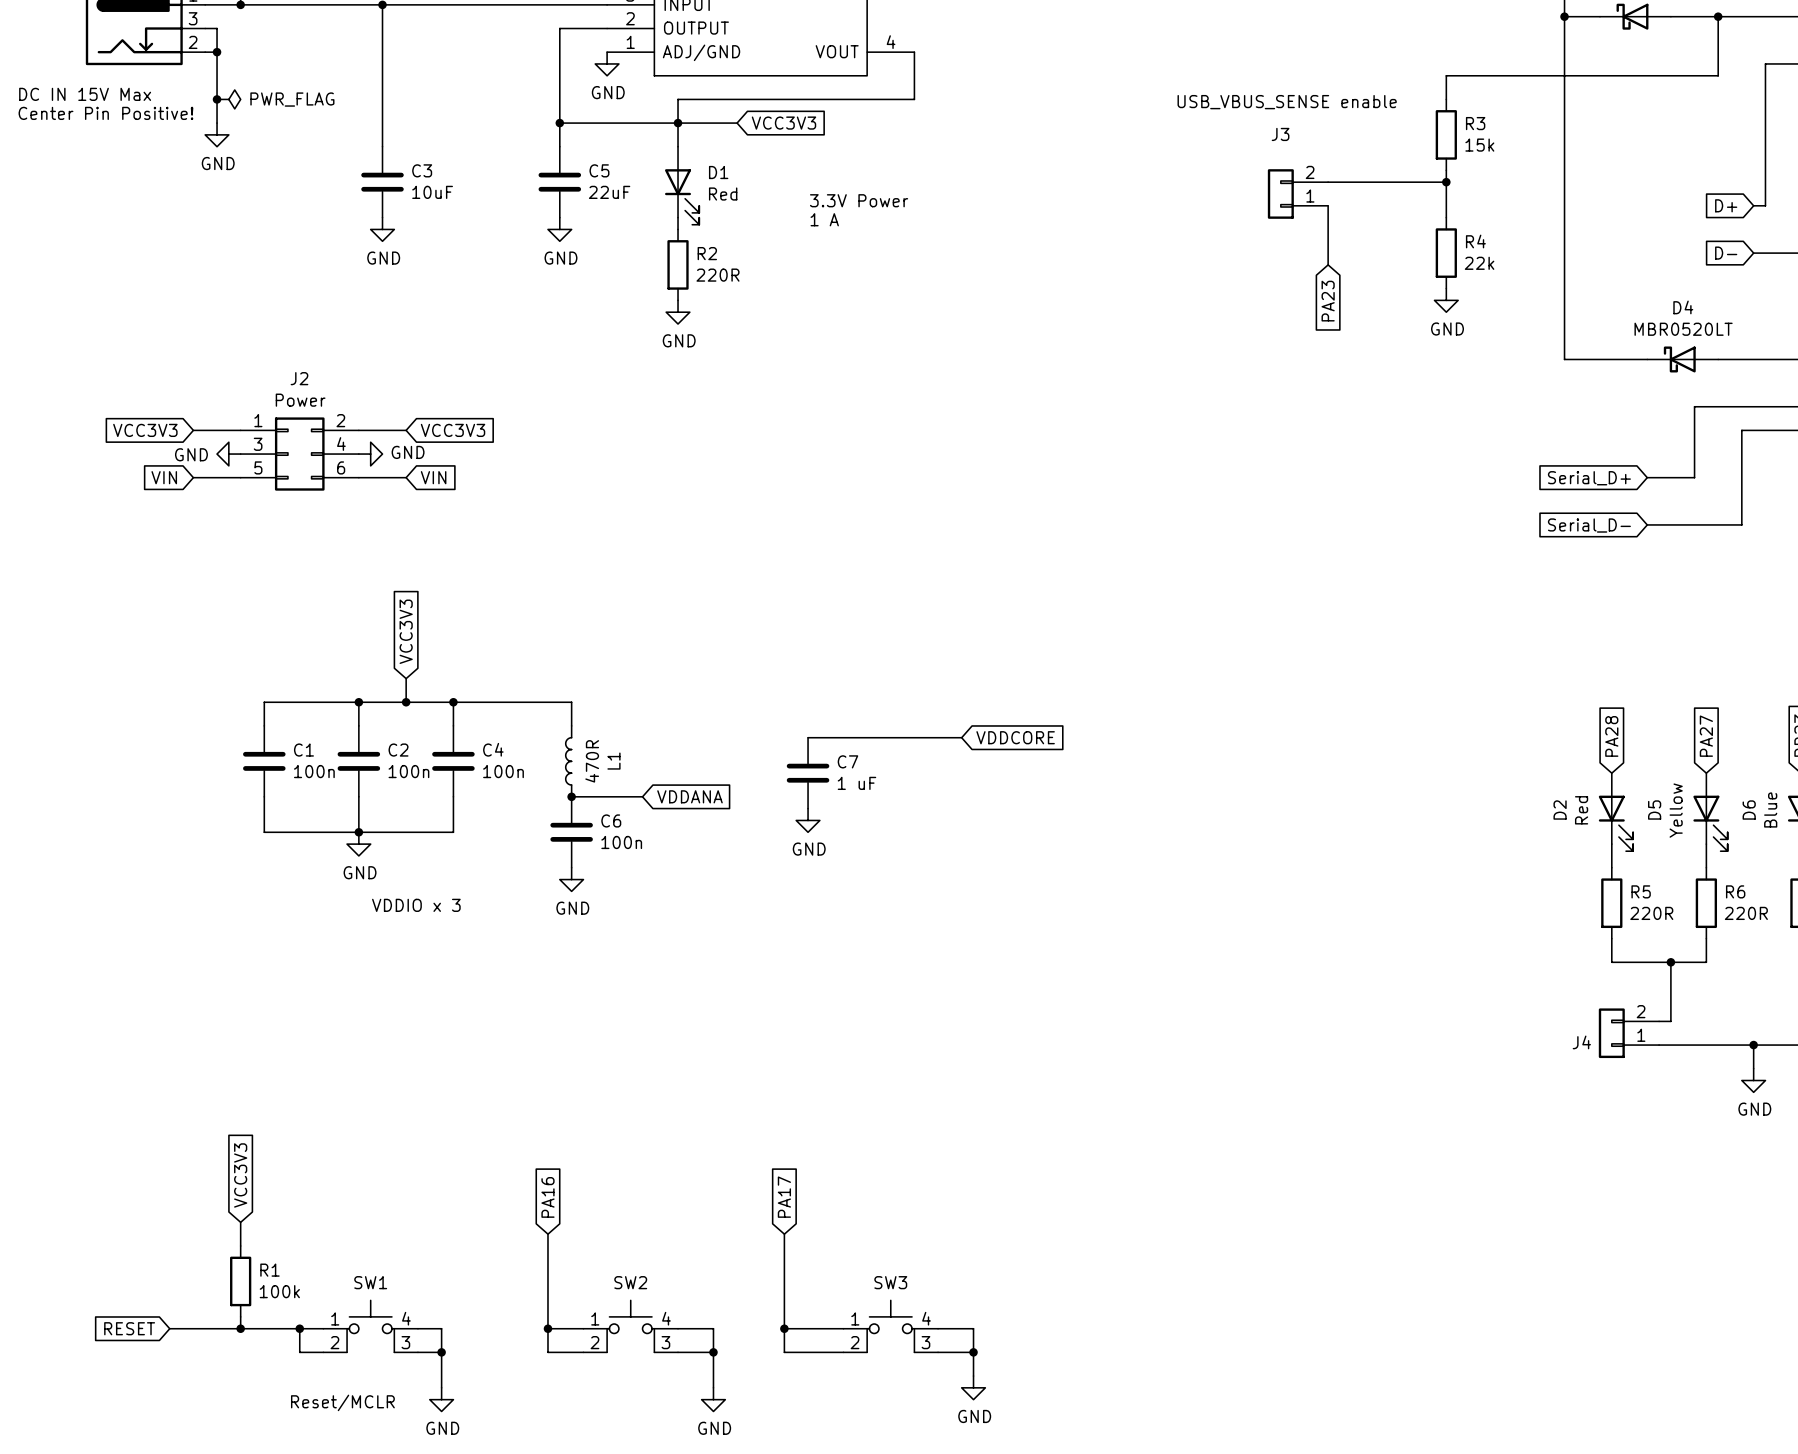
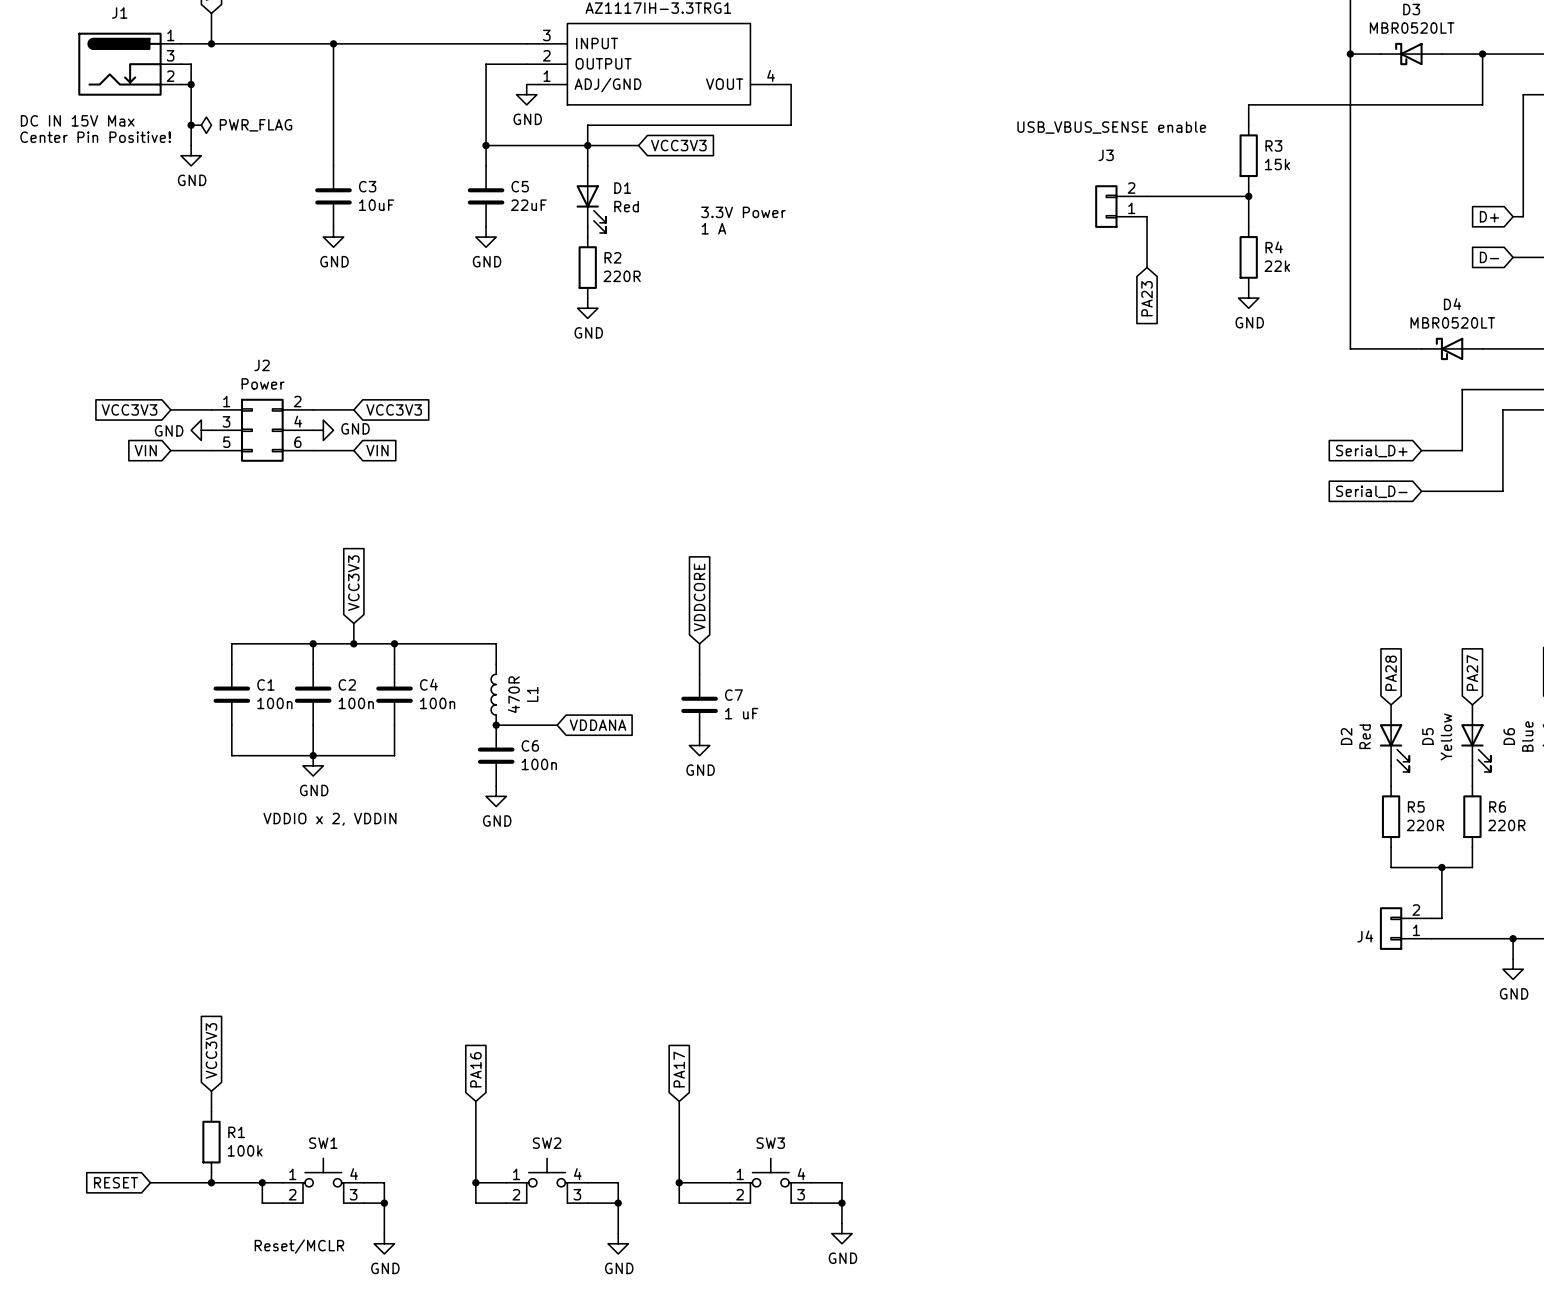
wire: (808, 737) (961, 737) -> (699, 674) (699, 643)
global label rotation: 0° (1015, 737) -> 90° counterclockwise (699, 597)
global label position: VDDCORE (1015, 737) -> VDDCORE (699, 597)
text: VDDIO x 3 (416, 905) -> VDDIO x 2, VDDIN (329, 819)

